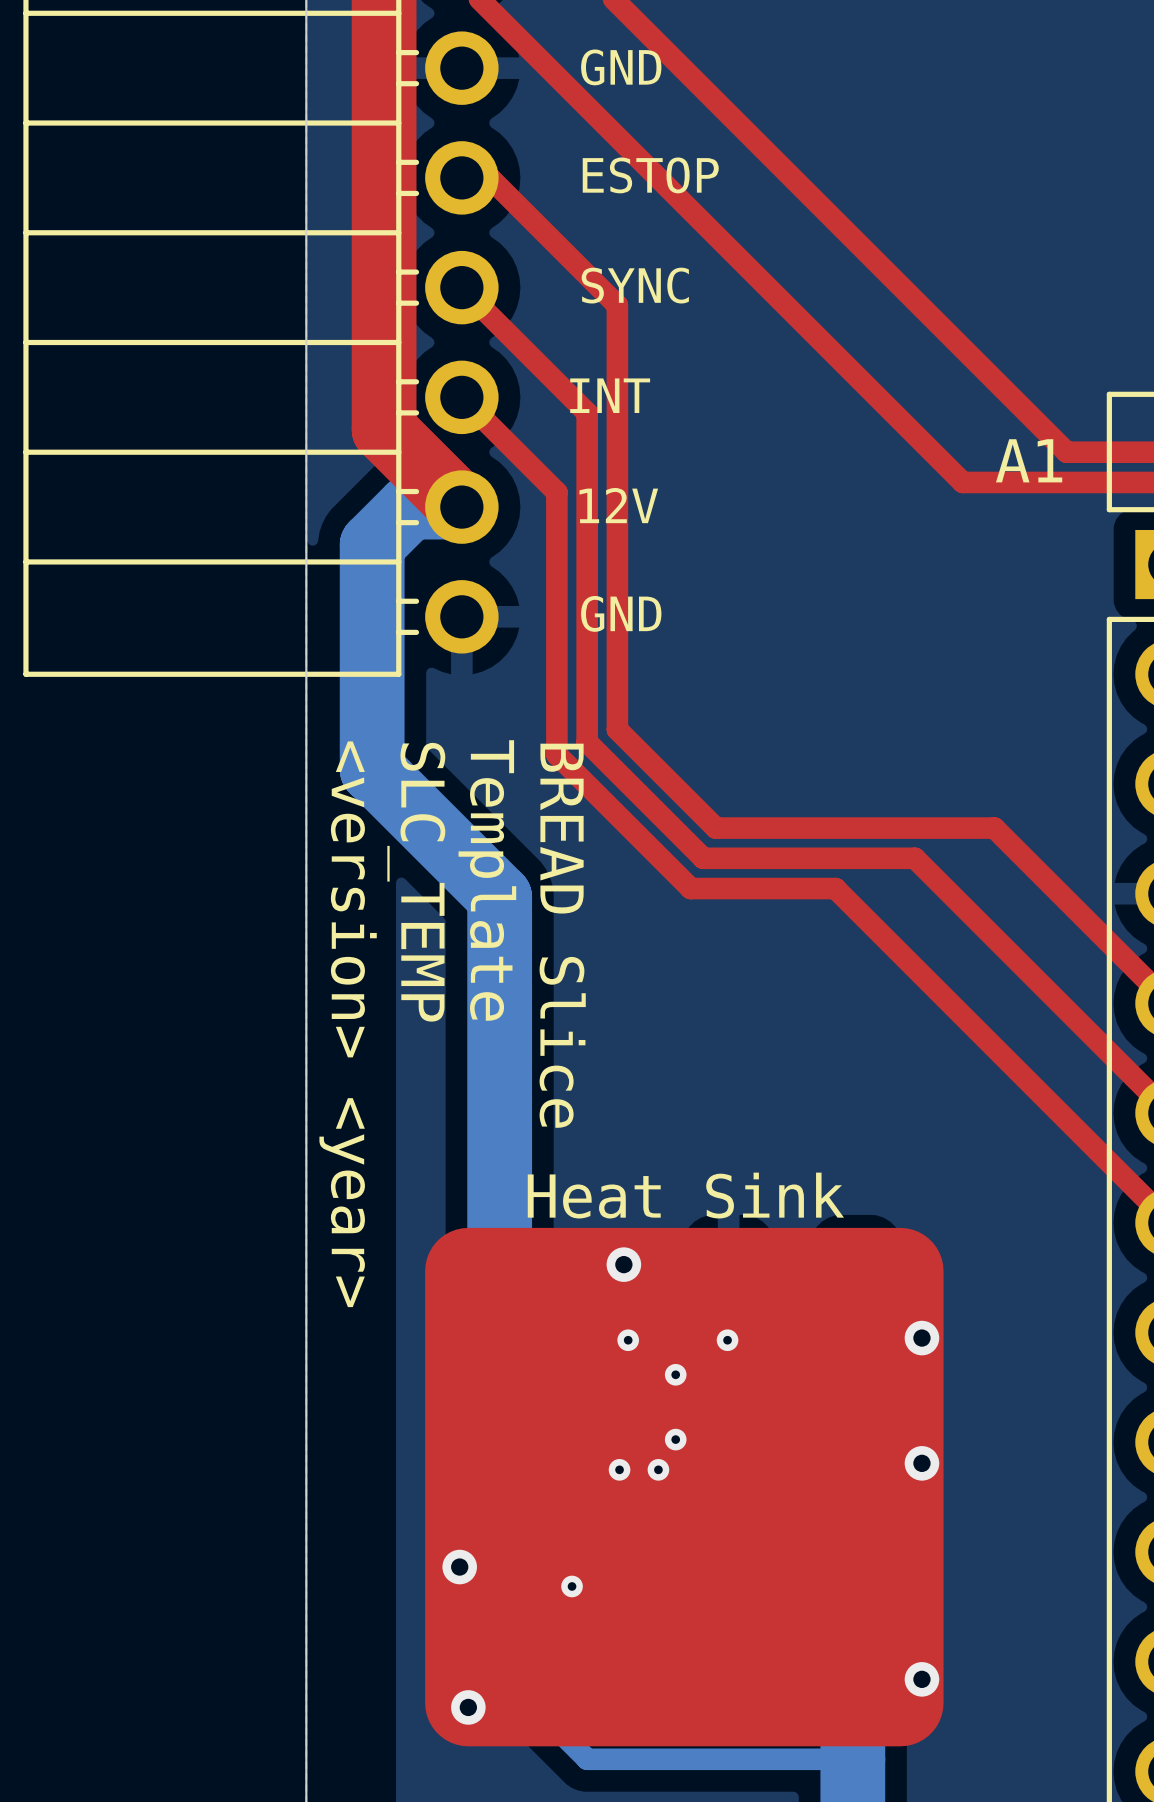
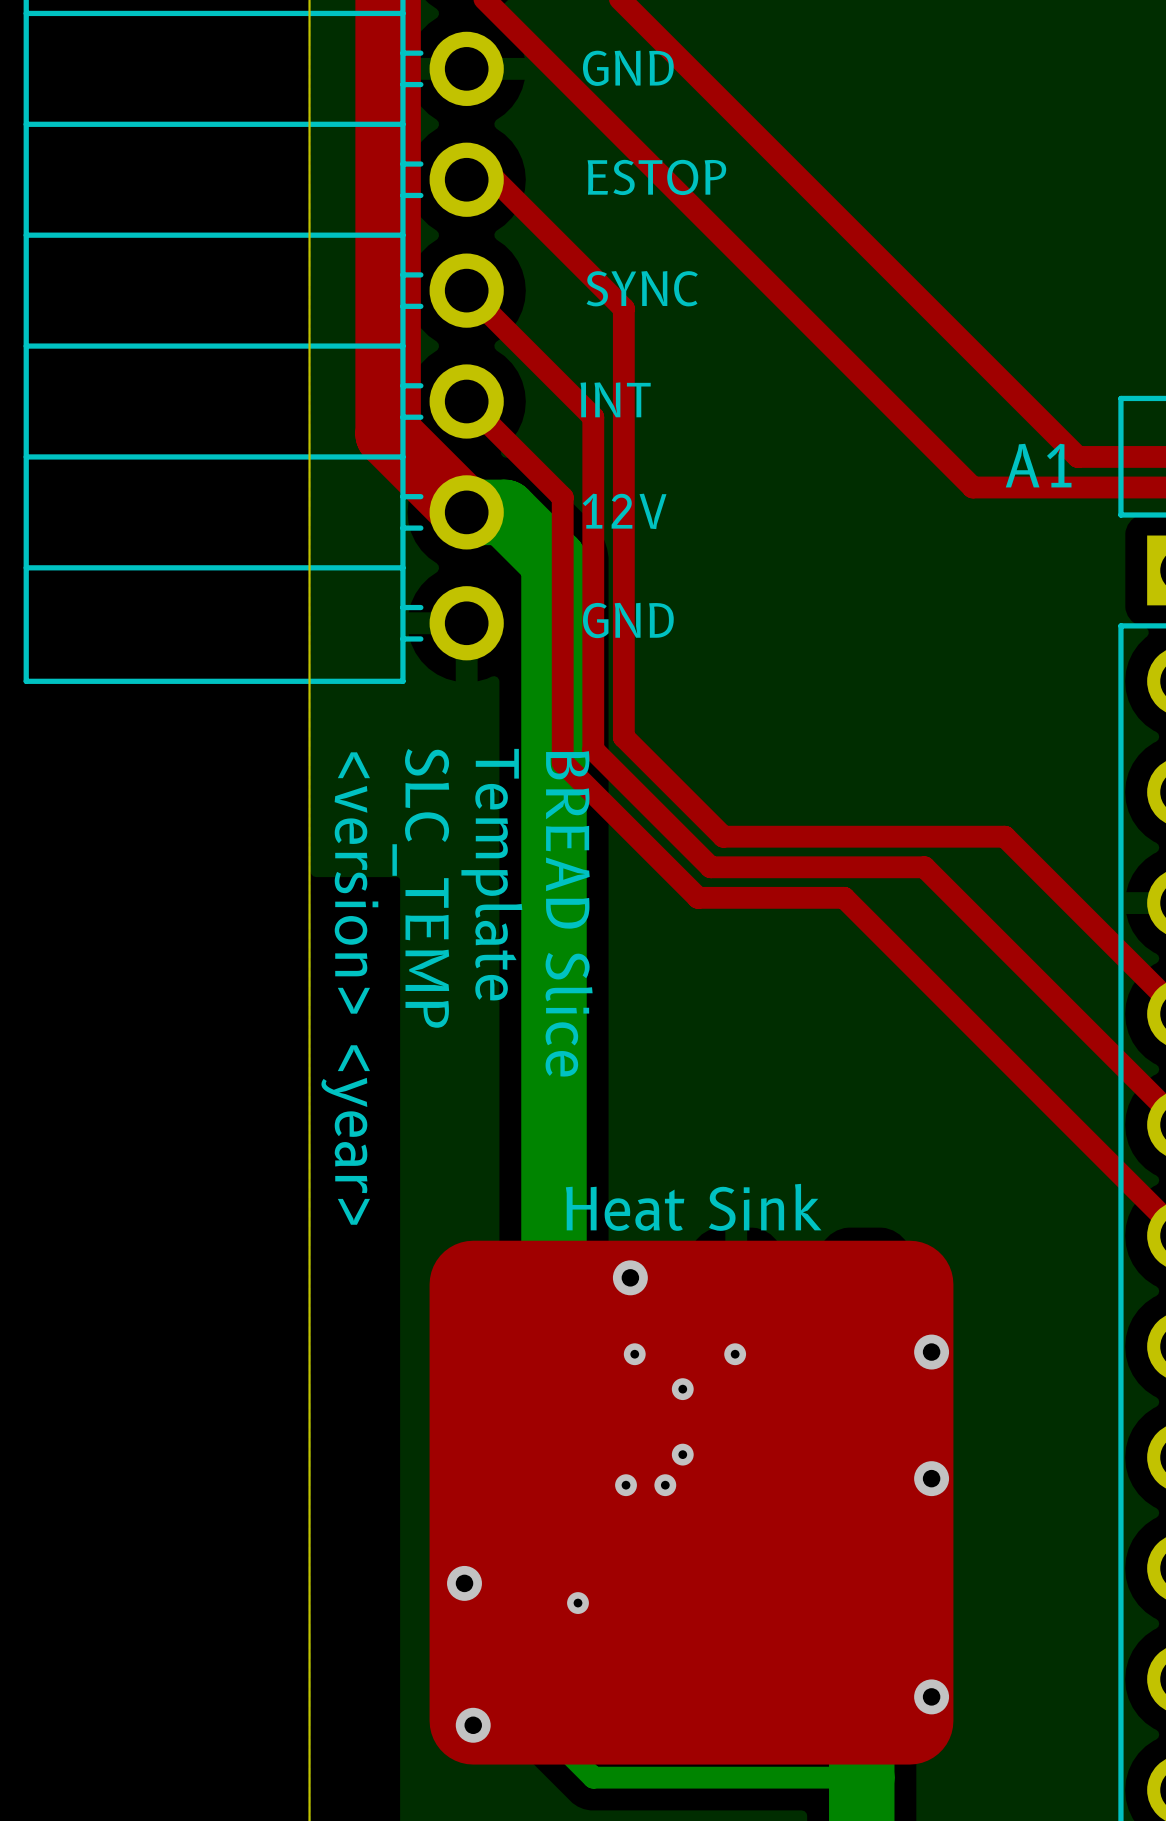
bottom track: (461, 507) (409, 507) (372, 544) (372, 769) (499, 897) (499, 1405) -> (466, 512) (504, 512) (553, 561) (553, 1370) (504, 1419)

